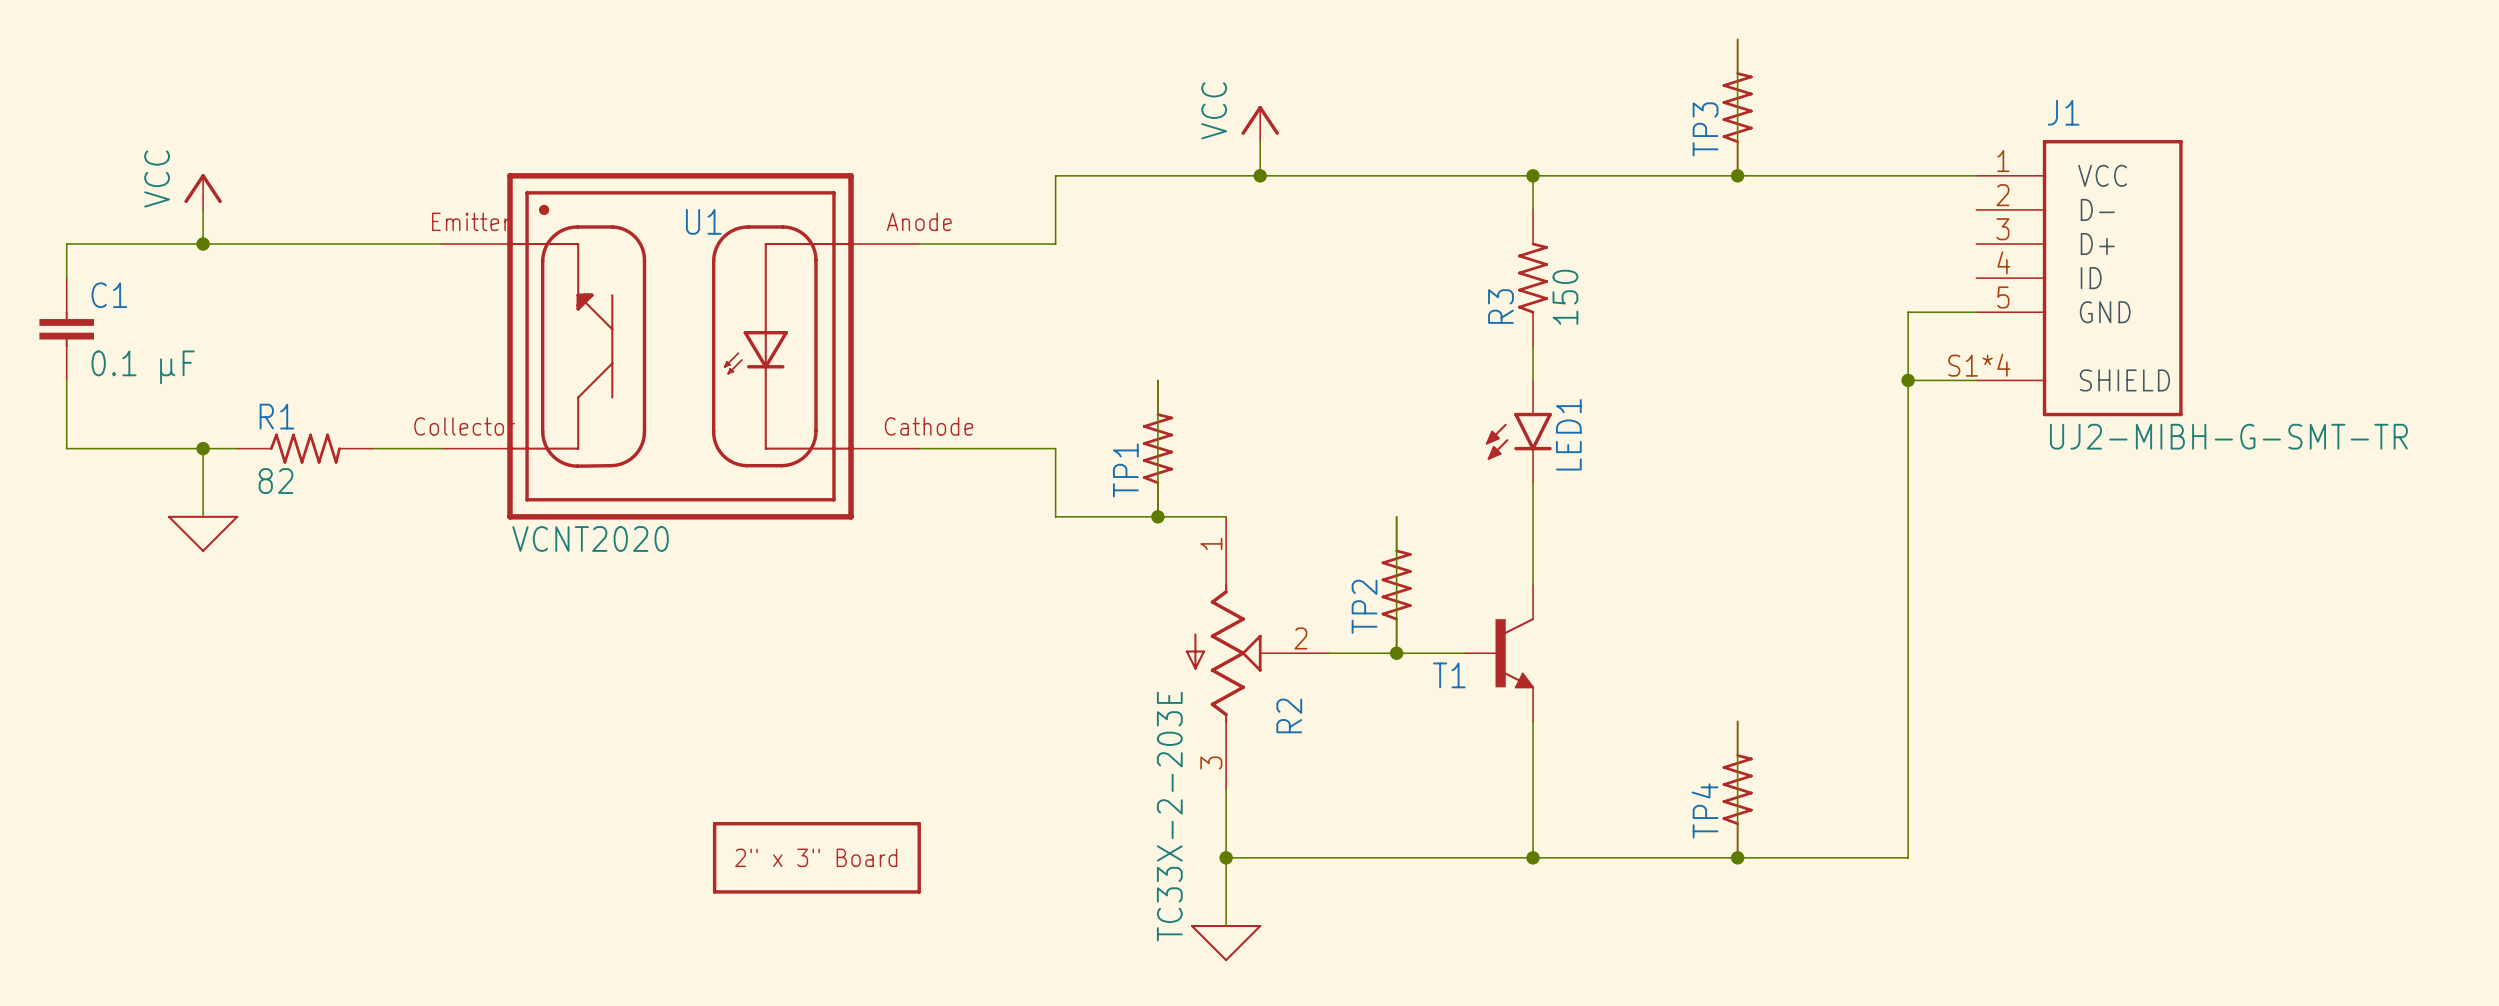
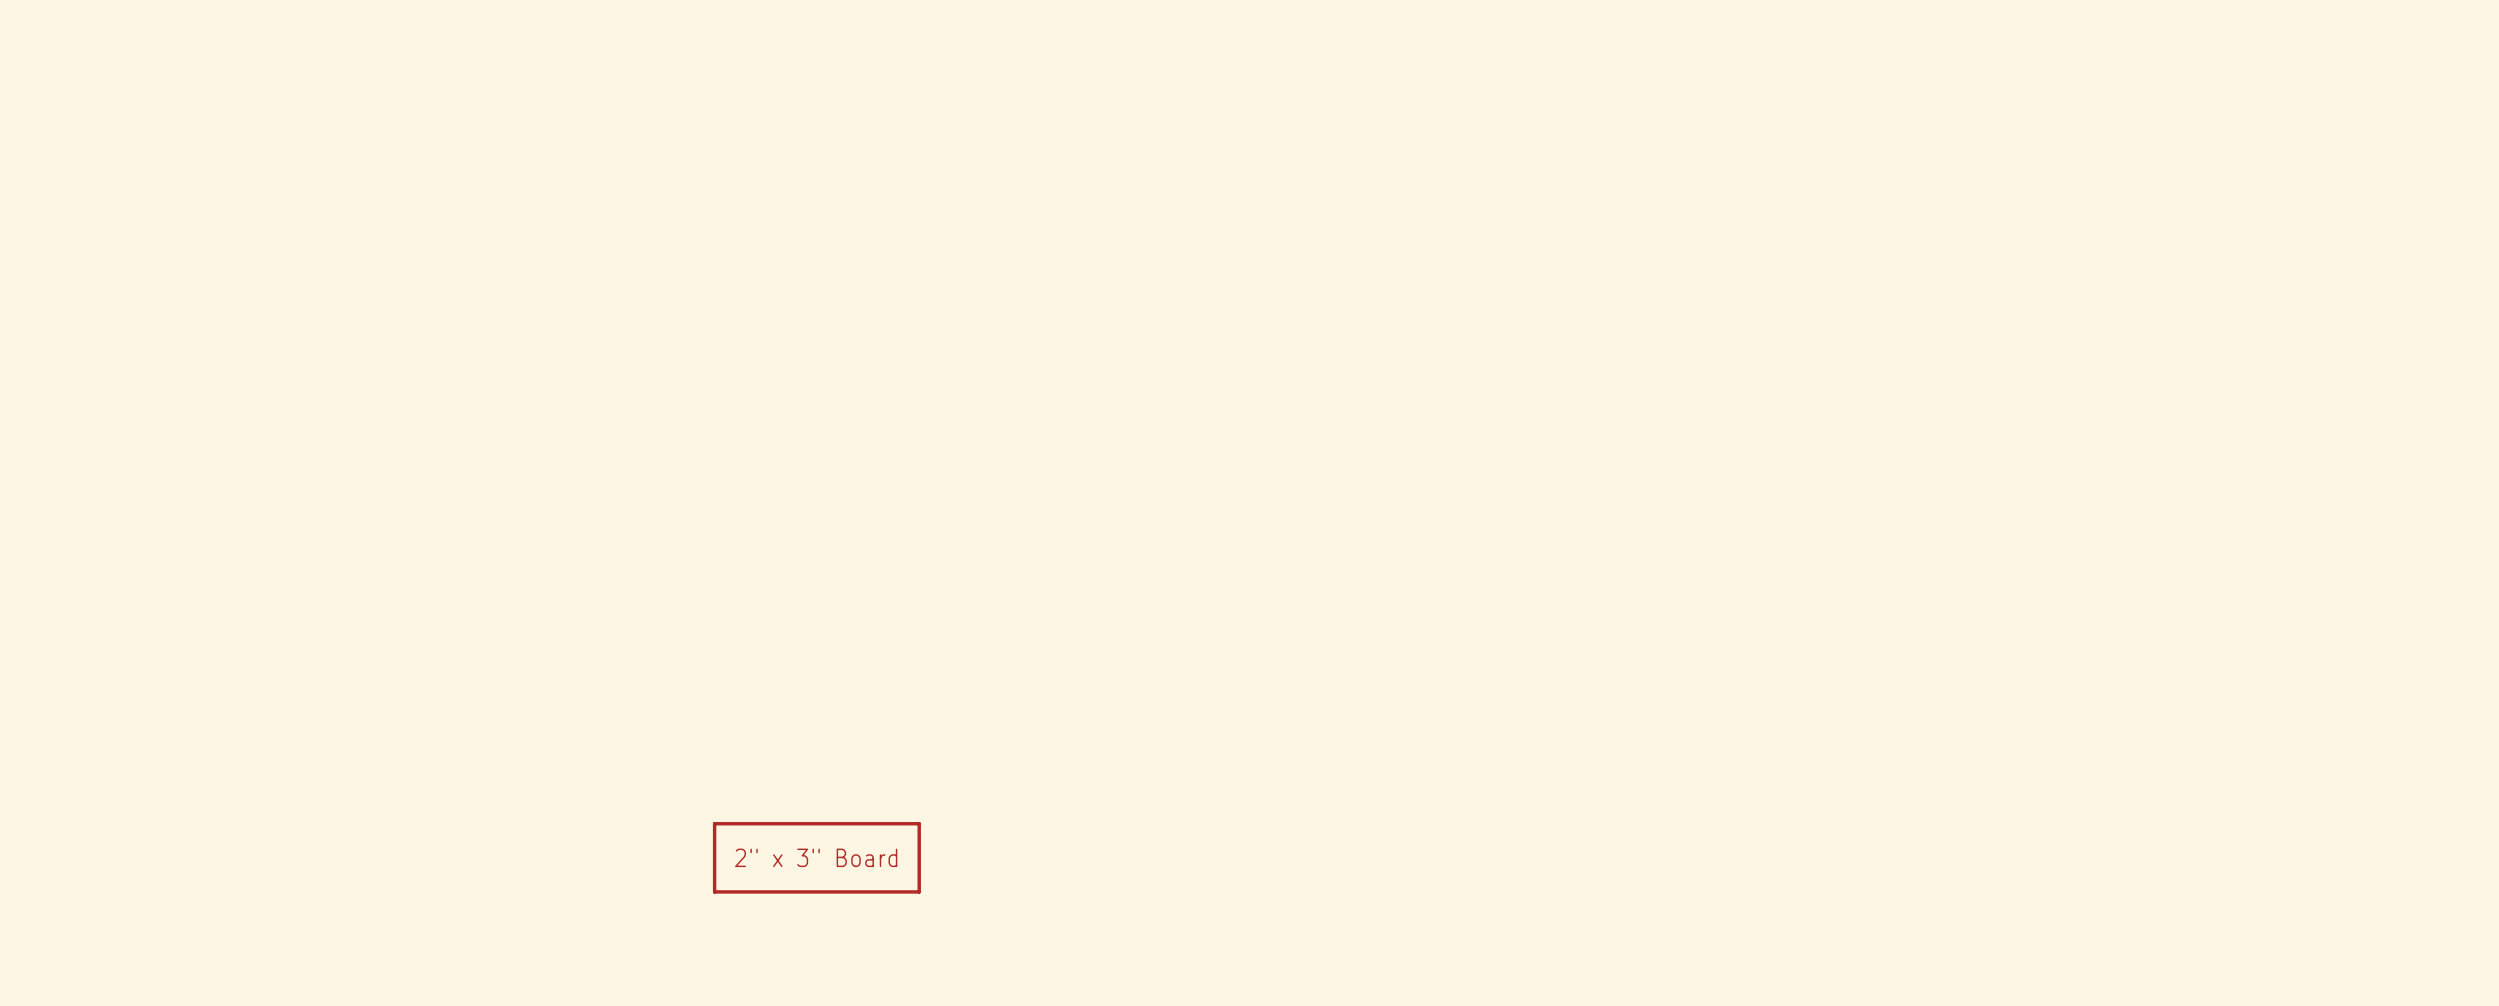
wire: (1737, 39) (1737, 175) -> none
TP3: (1737, 107) -> none
power symbol: VCC (1260, 123) -> none
wire: (1260, 141) (1260, 175) -> none
junction: (1260, 175) -> none
wire: (1533, 175) (1533, 209) -> none
junction: (1533, 175) -> none
junction: (1737, 175) -> none
wire: (1976, 175) (1055, 175) (1055, 244) (919, 244) -> none
power symbol: VCC (203, 192) -> none
wire: (203, 209) (203, 244) -> none
junction: (203, 244) -> none
wire: (441, 244) (66, 244) (66, 278) -> none
R3: 150 (1533, 278) -> none
J1: UJ2-MIBH-G-SMT-TR (2079, 278) -> none
wire: (1976, 312) (1908, 312) (1908, 857) (1226, 857) -> none
C1: 0.1 µF (66, 329) -> none
U1: VCNT2020 (680, 346) -> none
wire: (1533, 346) (1533, 380) -> none
wire: (66, 380) (66, 448) (237, 448) -> none
wire: (1157, 380) (1157, 516) -> none
wire: (1908, 380) (1976, 380) -> none
junction: (1908, 380) -> none
LED1: (1518, 431) -> none
wire: (203, 448) (203, 516) -> none
junction: (203, 448) -> none
R1: 82 (305, 448) -> none
wire: (373, 448) (441, 448) -> none
wire: (919, 448) (1055, 448) (1055, 516) (1226, 516) -> none
TP1: (1157, 448) -> none
wire: (1533, 482) (1533, 585) -> none
junction: (1157, 516) -> none
wire: (1396, 516) (1396, 653) -> none
power symbol: (203, 533) -> none
TP2: (1396, 585) -> none
R2: TC33X-2-203E (1257, 653) -> none
wire: (1328, 653) (1464, 653) -> none
junction: (1396, 653) -> none
T1: (1499, 653) -> none
wire: (1533, 721) (1533, 857) -> none
wire: (1737, 721) (1737, 857) -> none
wire: (1226, 789) (1226, 926) -> none
TP4: (1737, 789) -> none
junction: (1226, 857) -> none
junction: (1533, 857) -> none
junction: (1737, 857) -> none
power symbol: (1226, 943) -> none

